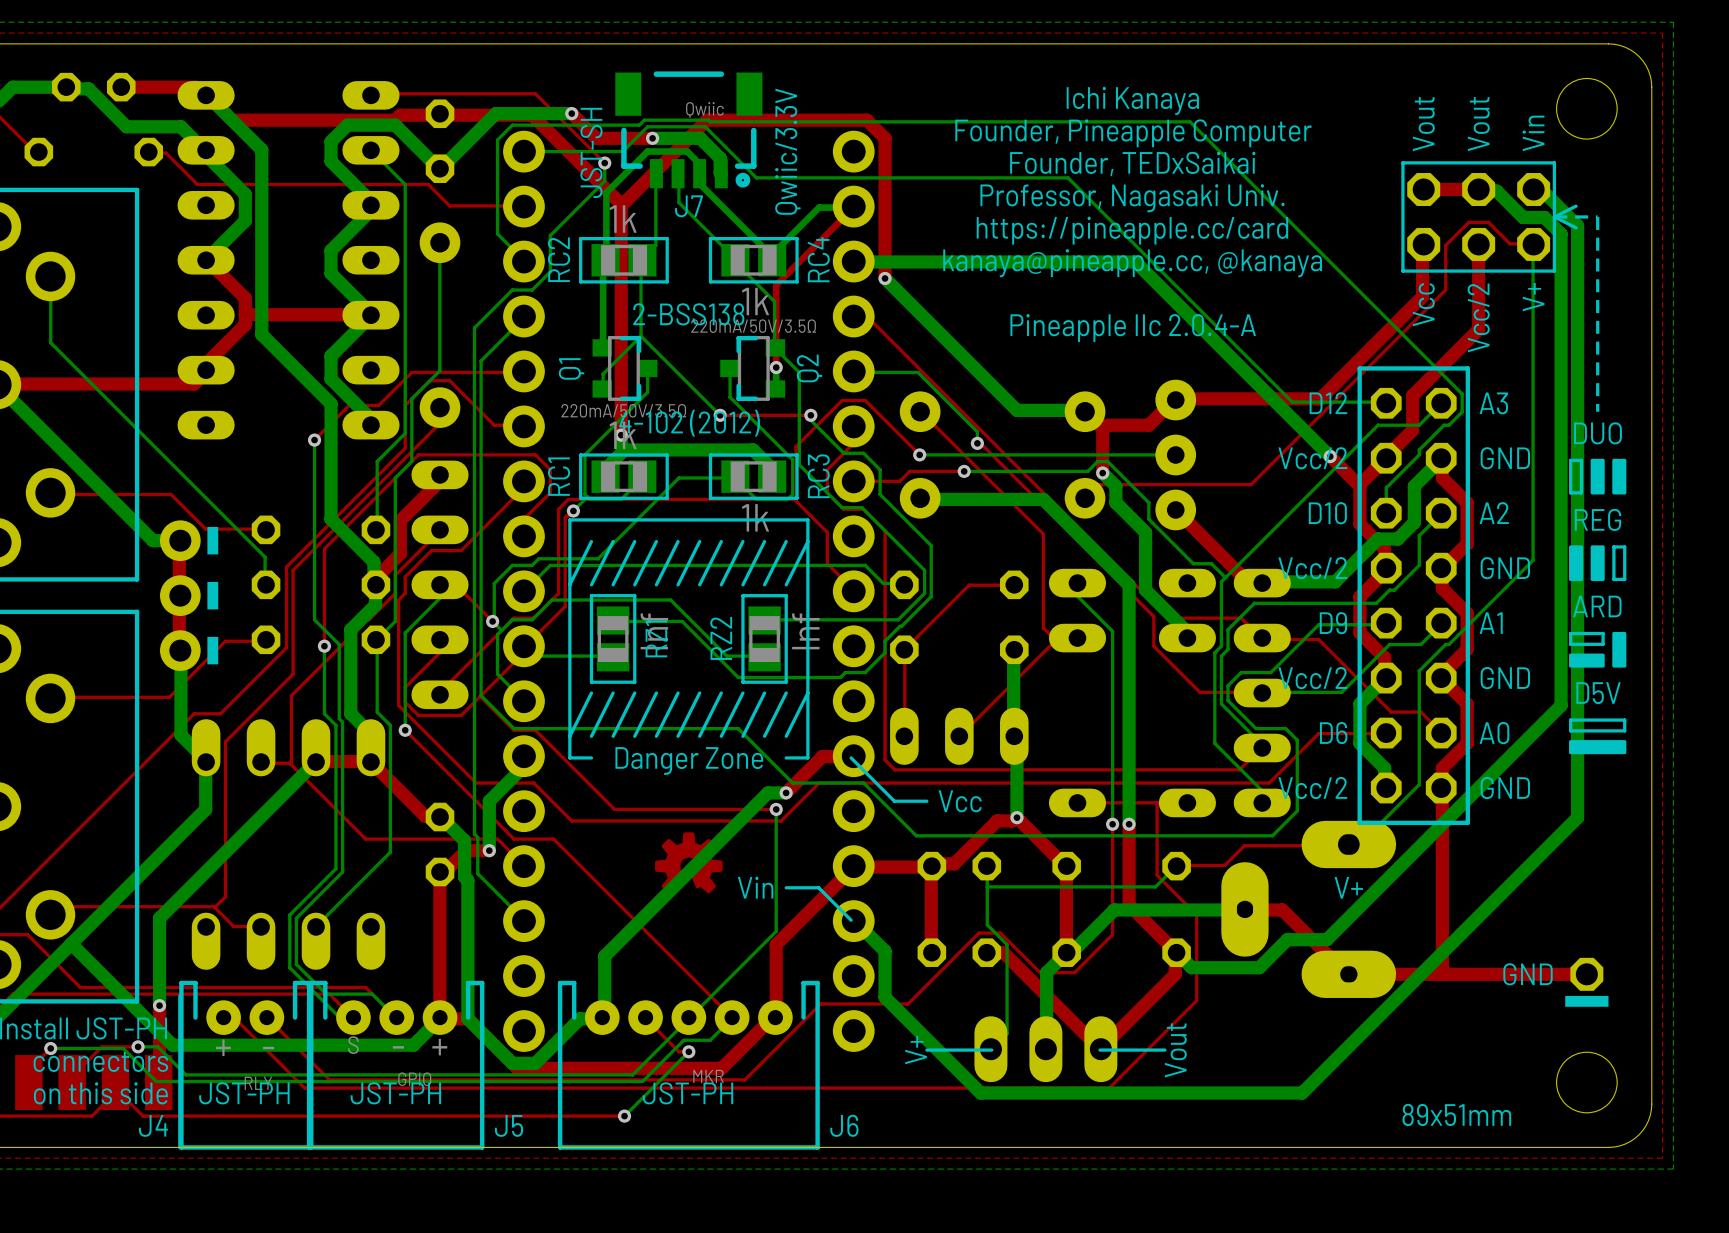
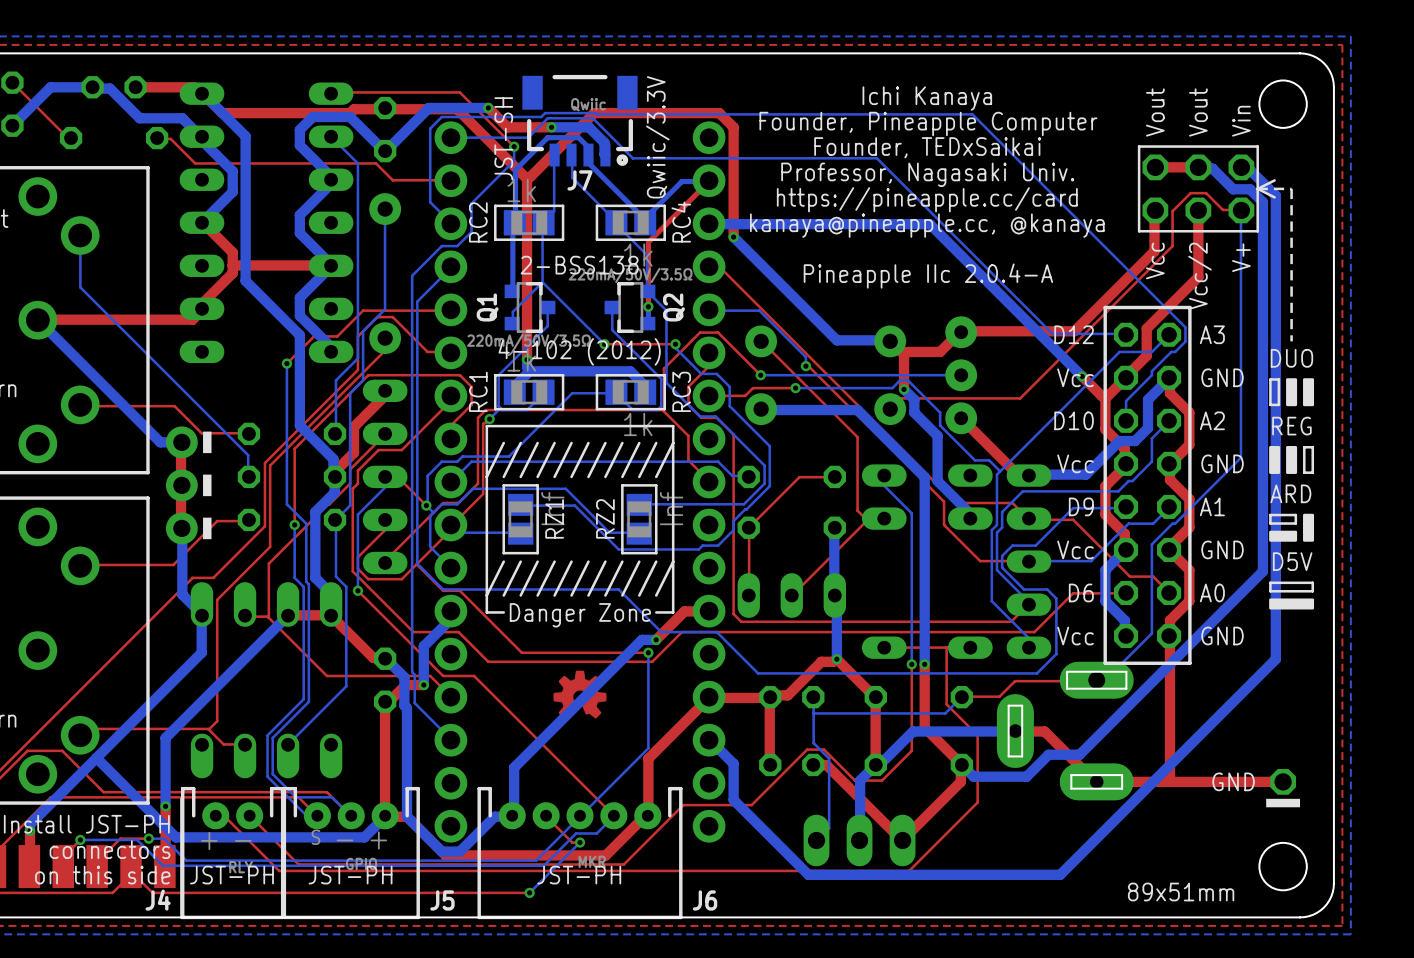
text: Vcc/2 (1312, 458) -> Vcc (1075, 377)
text: Vcc/2 (1312, 568) -> Vcc (1075, 463)
text: Vcc/2 (1312, 678) -> Vcc (1075, 549)
line: (851, 757) (894, 801) (926, 801) -> none
text: Vcc/2 (1312, 788) -> Vcc (1075, 636)
text: Vcc (960, 801) -> none
text: Vin (755, 887) -> none
line: (786, 887) (818, 887) (851, 920) -> none
text: V+ (1348, 887) -> none
text: V+ (916, 1050) -> none
line: (991, 1050) (926, 1050) -> none
line: (1164, 1050) (1099, 1050) -> none
text: Vout (1175, 1050) -> none

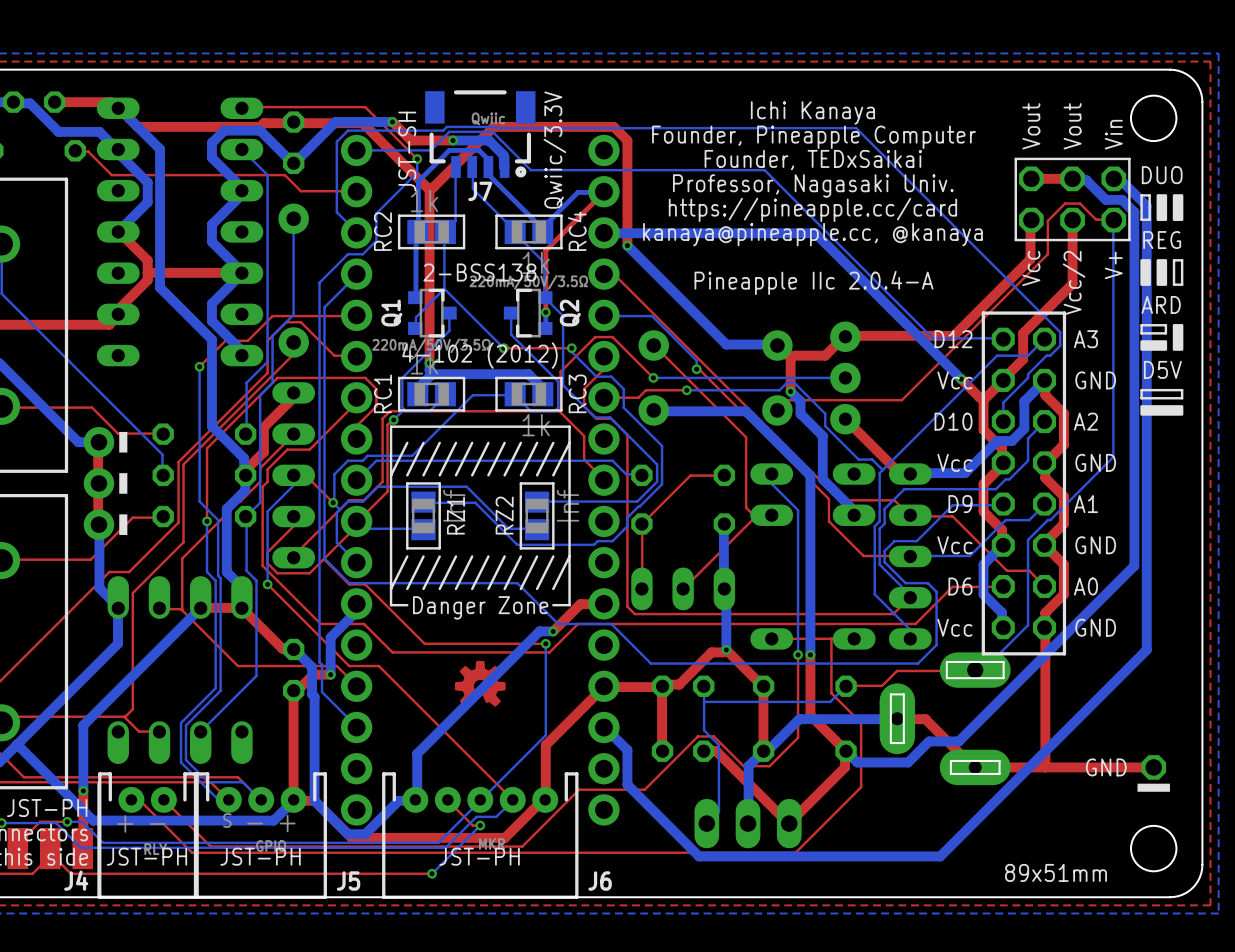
line: (1274, 180) (1257, 188) -> none
drawing: none -> [1156, 194, 1184, 221]
line: none -> (1149, 195) (1141, 195) (1141, 219) (1149, 219) (1149, 195)
line: (1257, 188) (1274, 197) -> none
line: (1257, 188) (1291, 188) (1291, 341) -> none
drawing: none -> [1140, 259, 1168, 286]
drawing: none -> [1172, 324, 1184, 351]
text position: DUO (1291, 358) -> DUO (1162, 175)
drawing: [1286, 378, 1315, 407] -> none
line: (1270, 387) (1270, 379) (1278, 379) (1278, 404) (1270, 404) (1270, 396) -> (1141, 390) (1182, 390) (1182, 398) (1141, 398)
text position: REG (1291, 426) -> REG (1162, 240)
drawing: [1269, 446, 1298, 474] -> none
line: (1312, 447) (1312, 472) (1304, 472) (1304, 447) (1312, 447) -> (1182, 260) (1182, 284) (1174, 284) (1174, 260) (1182, 260)
text position: ARD (1290, 493) -> ARD (1161, 304)
drawing: [1303, 513, 1315, 542] -> none
line: (1295, 515) (1270, 515) (1270, 523) (1295, 523) (1295, 515) -> (1165, 325) (1141, 325) (1141, 333) (1165, 333) (1165, 325)
drawing position: (1283, 536) -> (1153, 345)
text position: D5V (1292, 561) -> D5V (1162, 369)
line: (1312, 582) (1312, 591) (1270, 591) (1270, 582) (1312, 582) -> none
drawing position: (1291, 603) -> (1161, 410)

